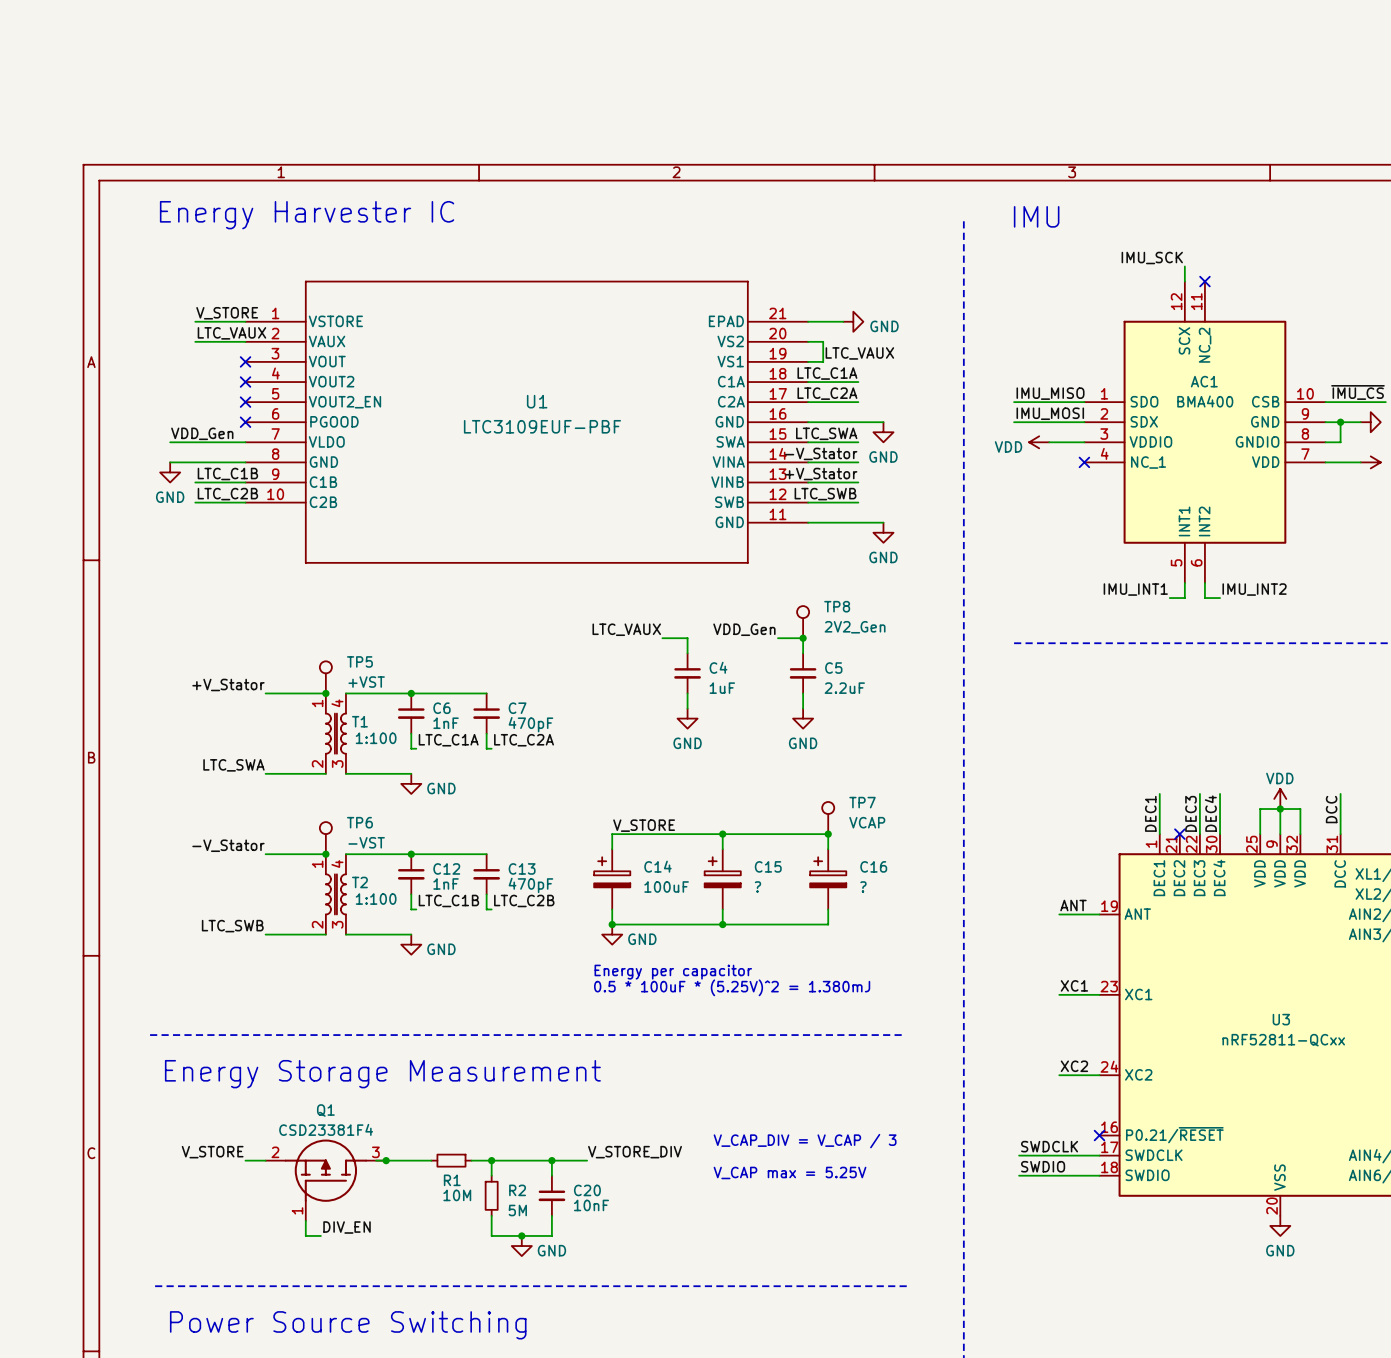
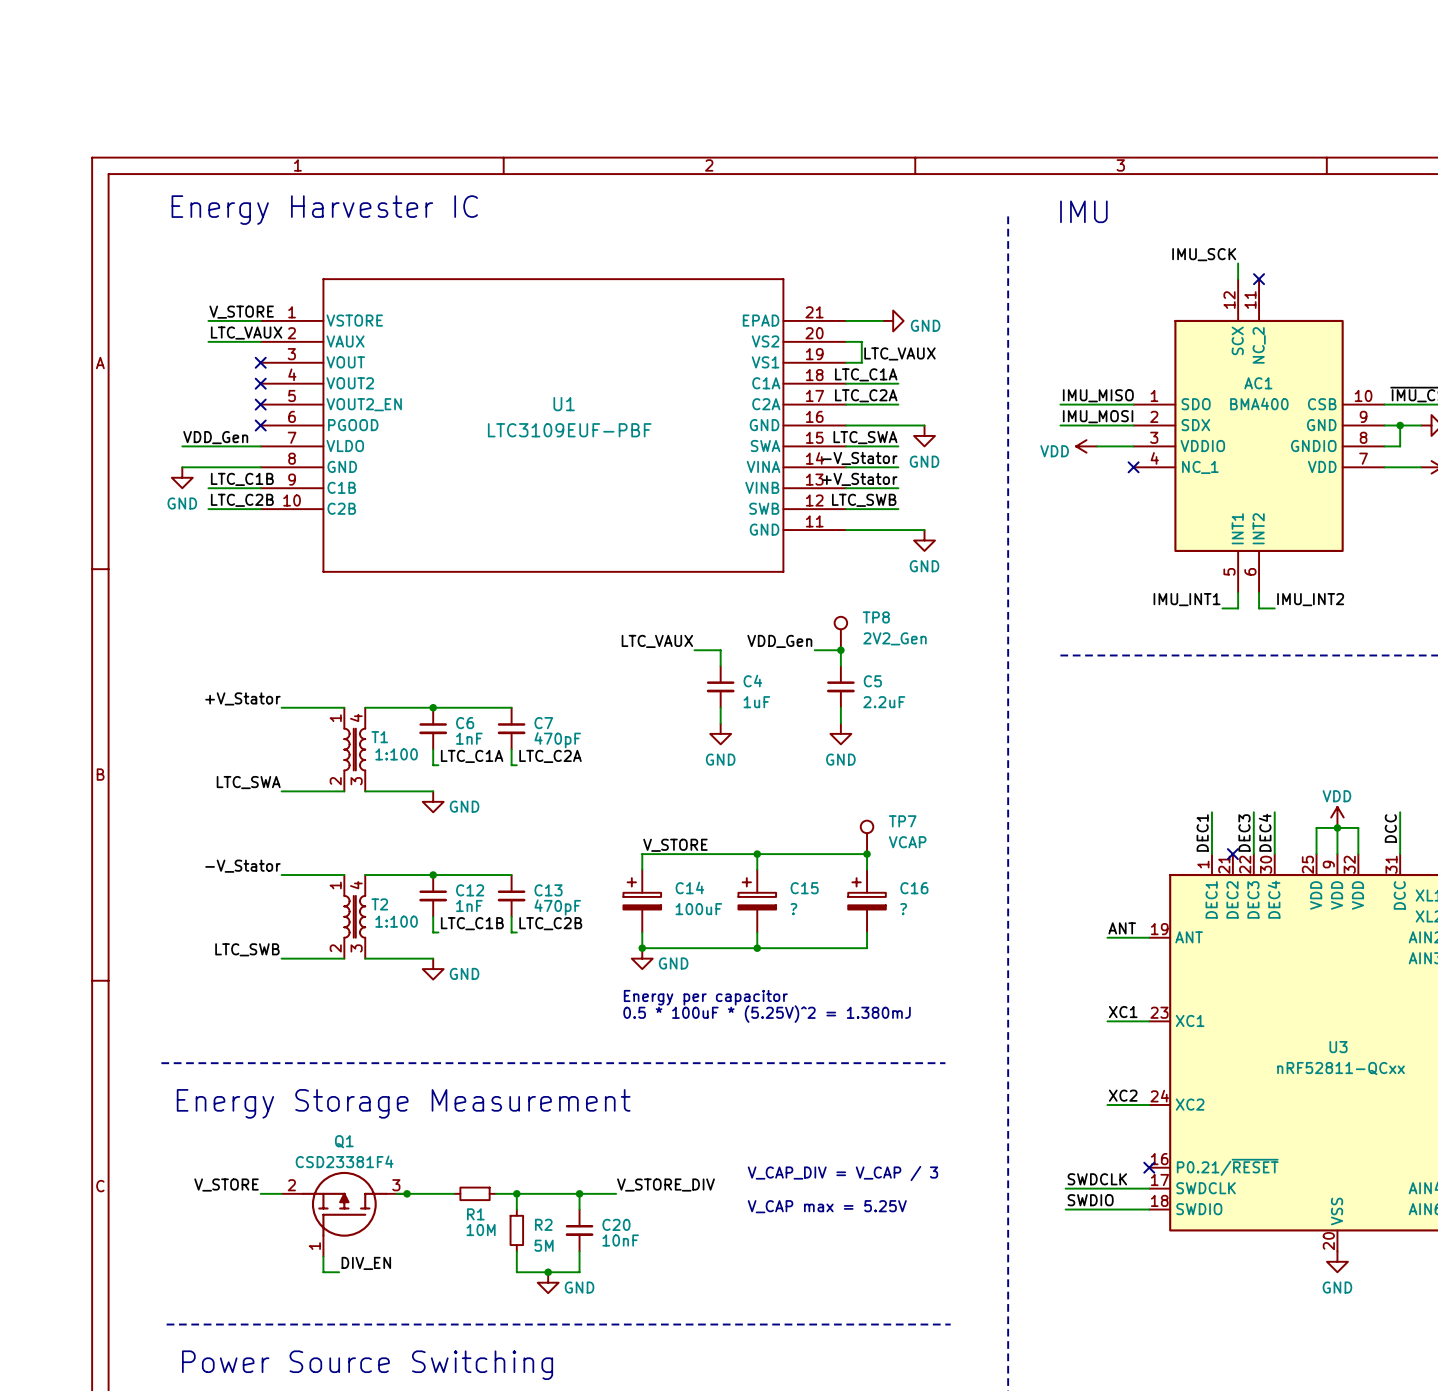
TP5: +VST (325, 677) -> none
junction: (325, 693) -> none
TP6: -VST (325, 838) -> none
junction: (325, 854) -> none

